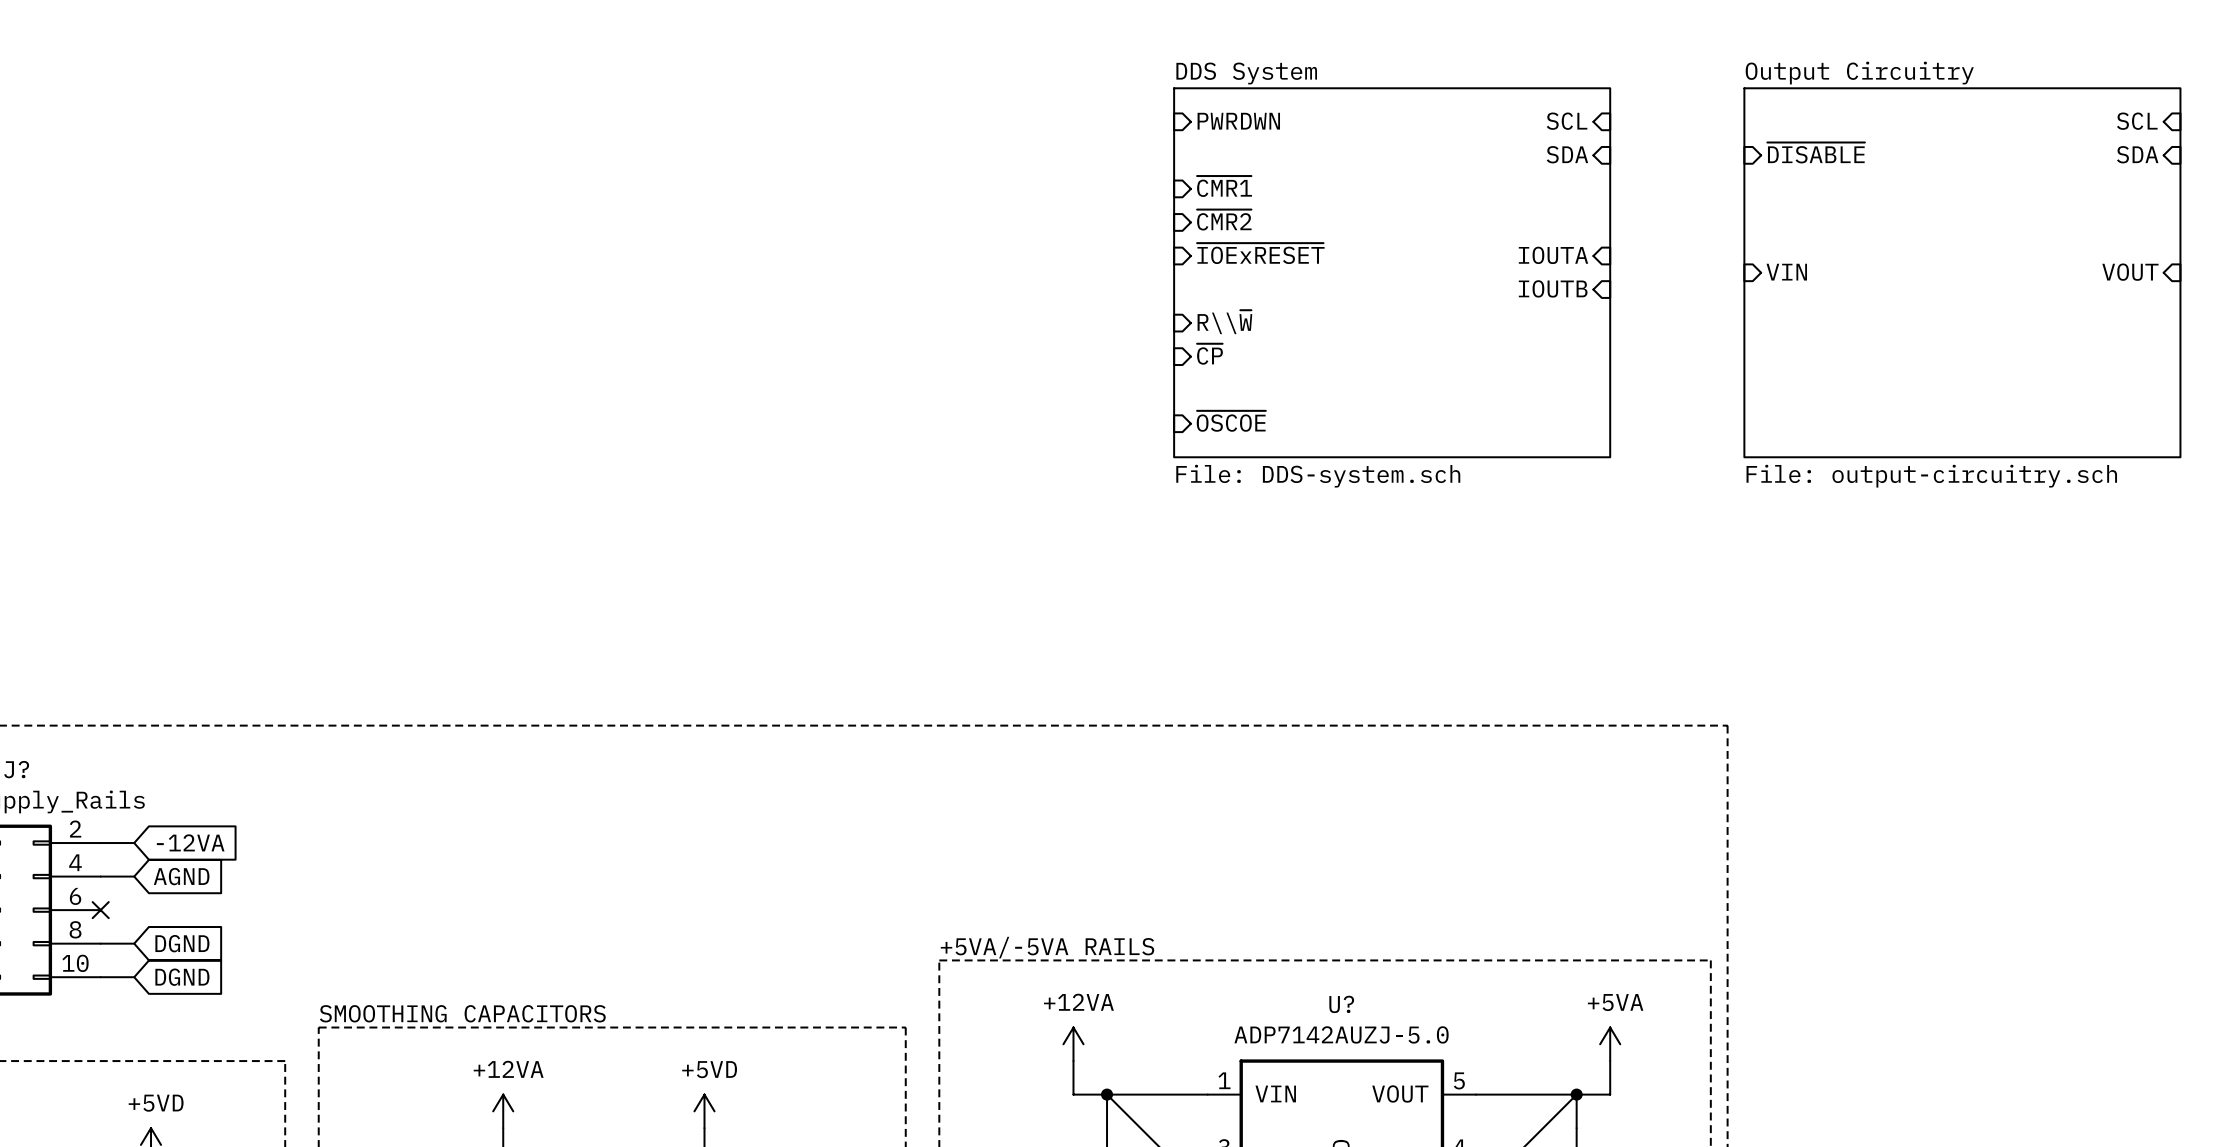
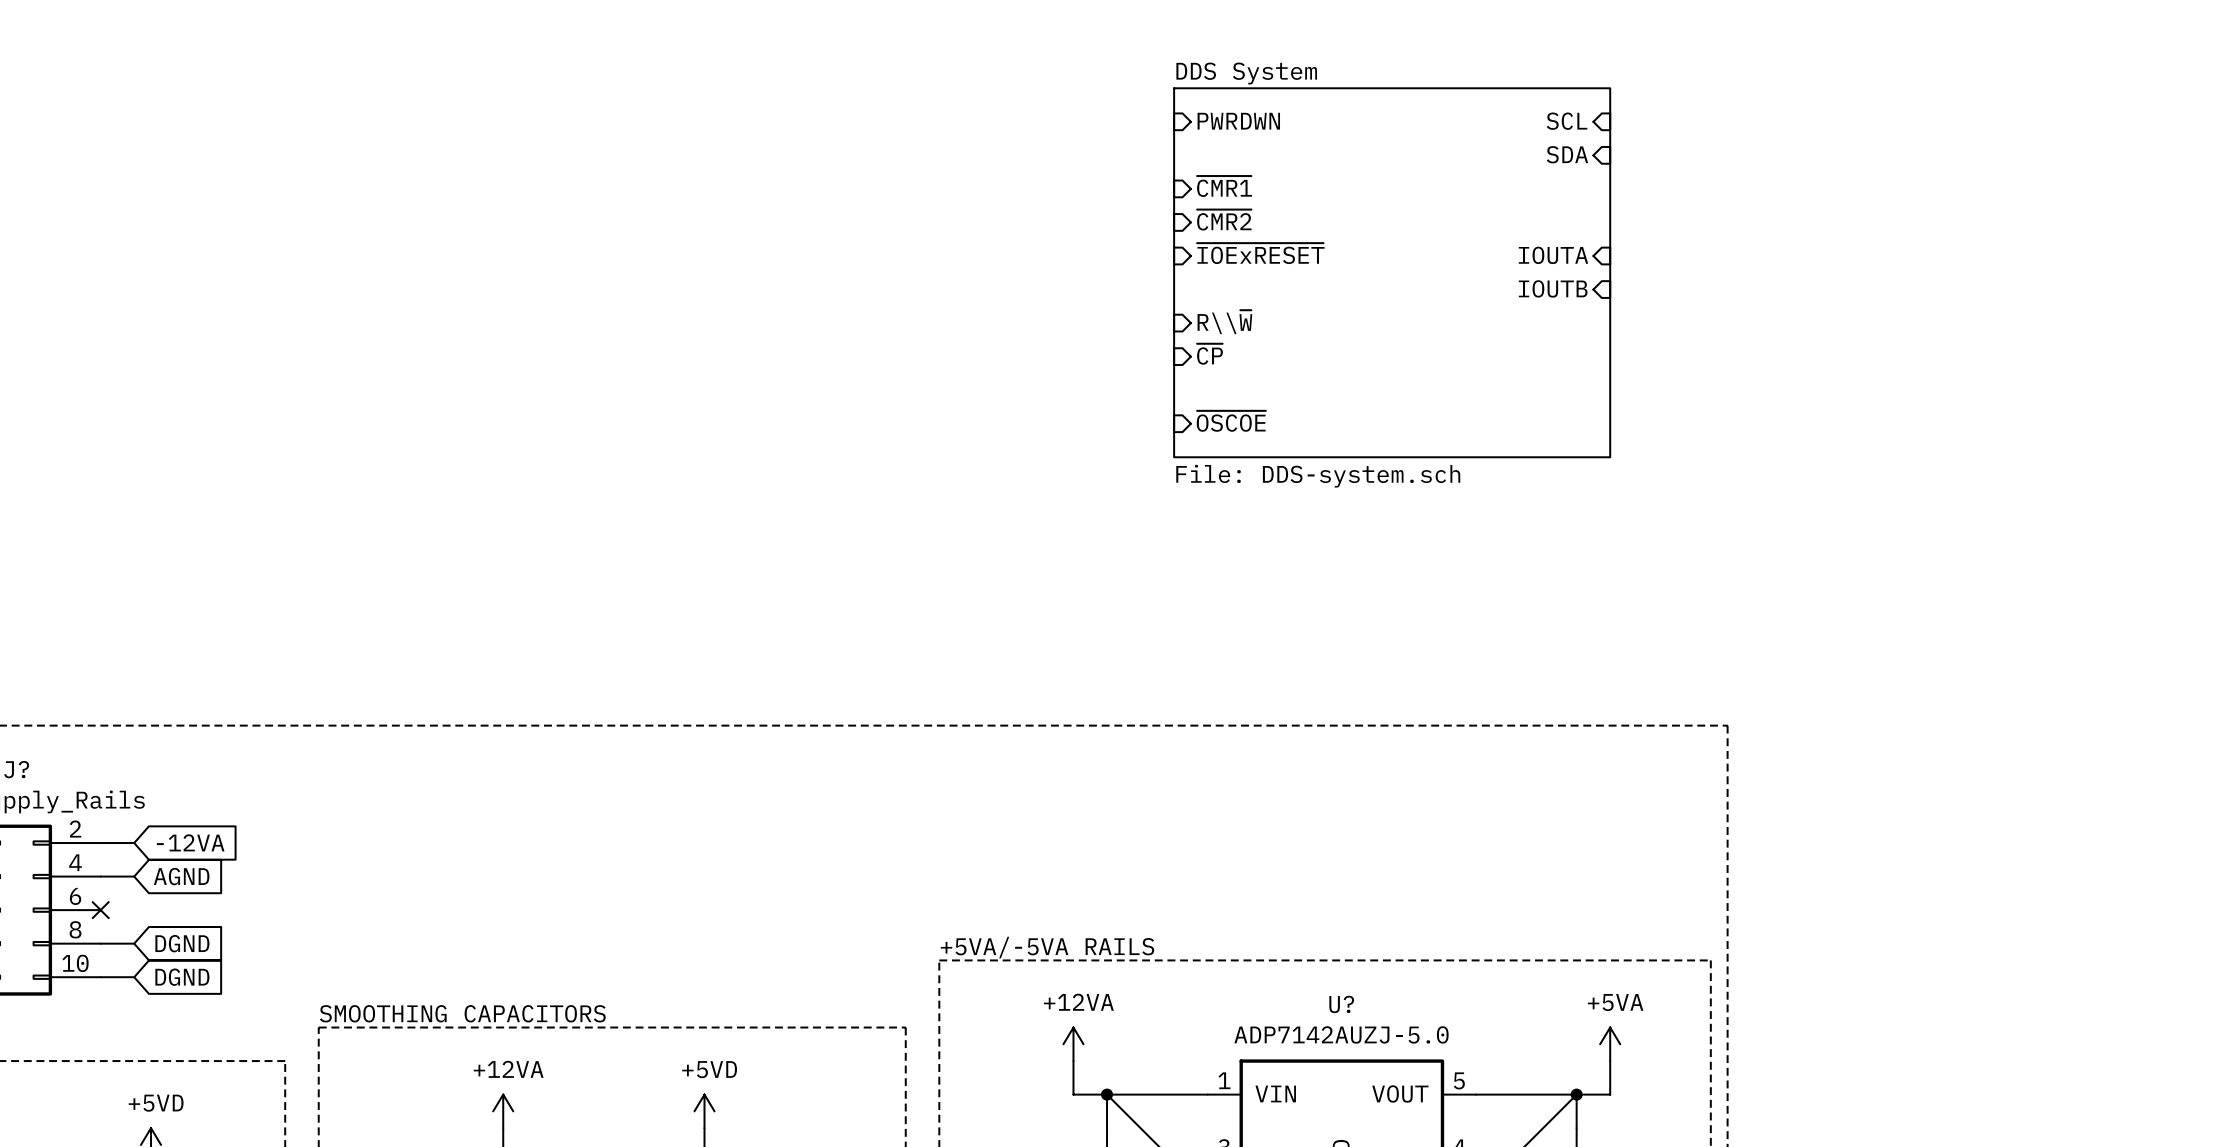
sheet pin: SCL (2137, 121) -> none
sheet pin: ~{DISABLE} (1816, 152) -> none
sheet pin: SDA (2137, 154) -> none
sheet pin: VIN (1786, 272) -> none
sheet Output Circuitry: File: output-circuitry.sch (1962, 272) -> none
sheet pin: VOUT (2130, 272) -> none

